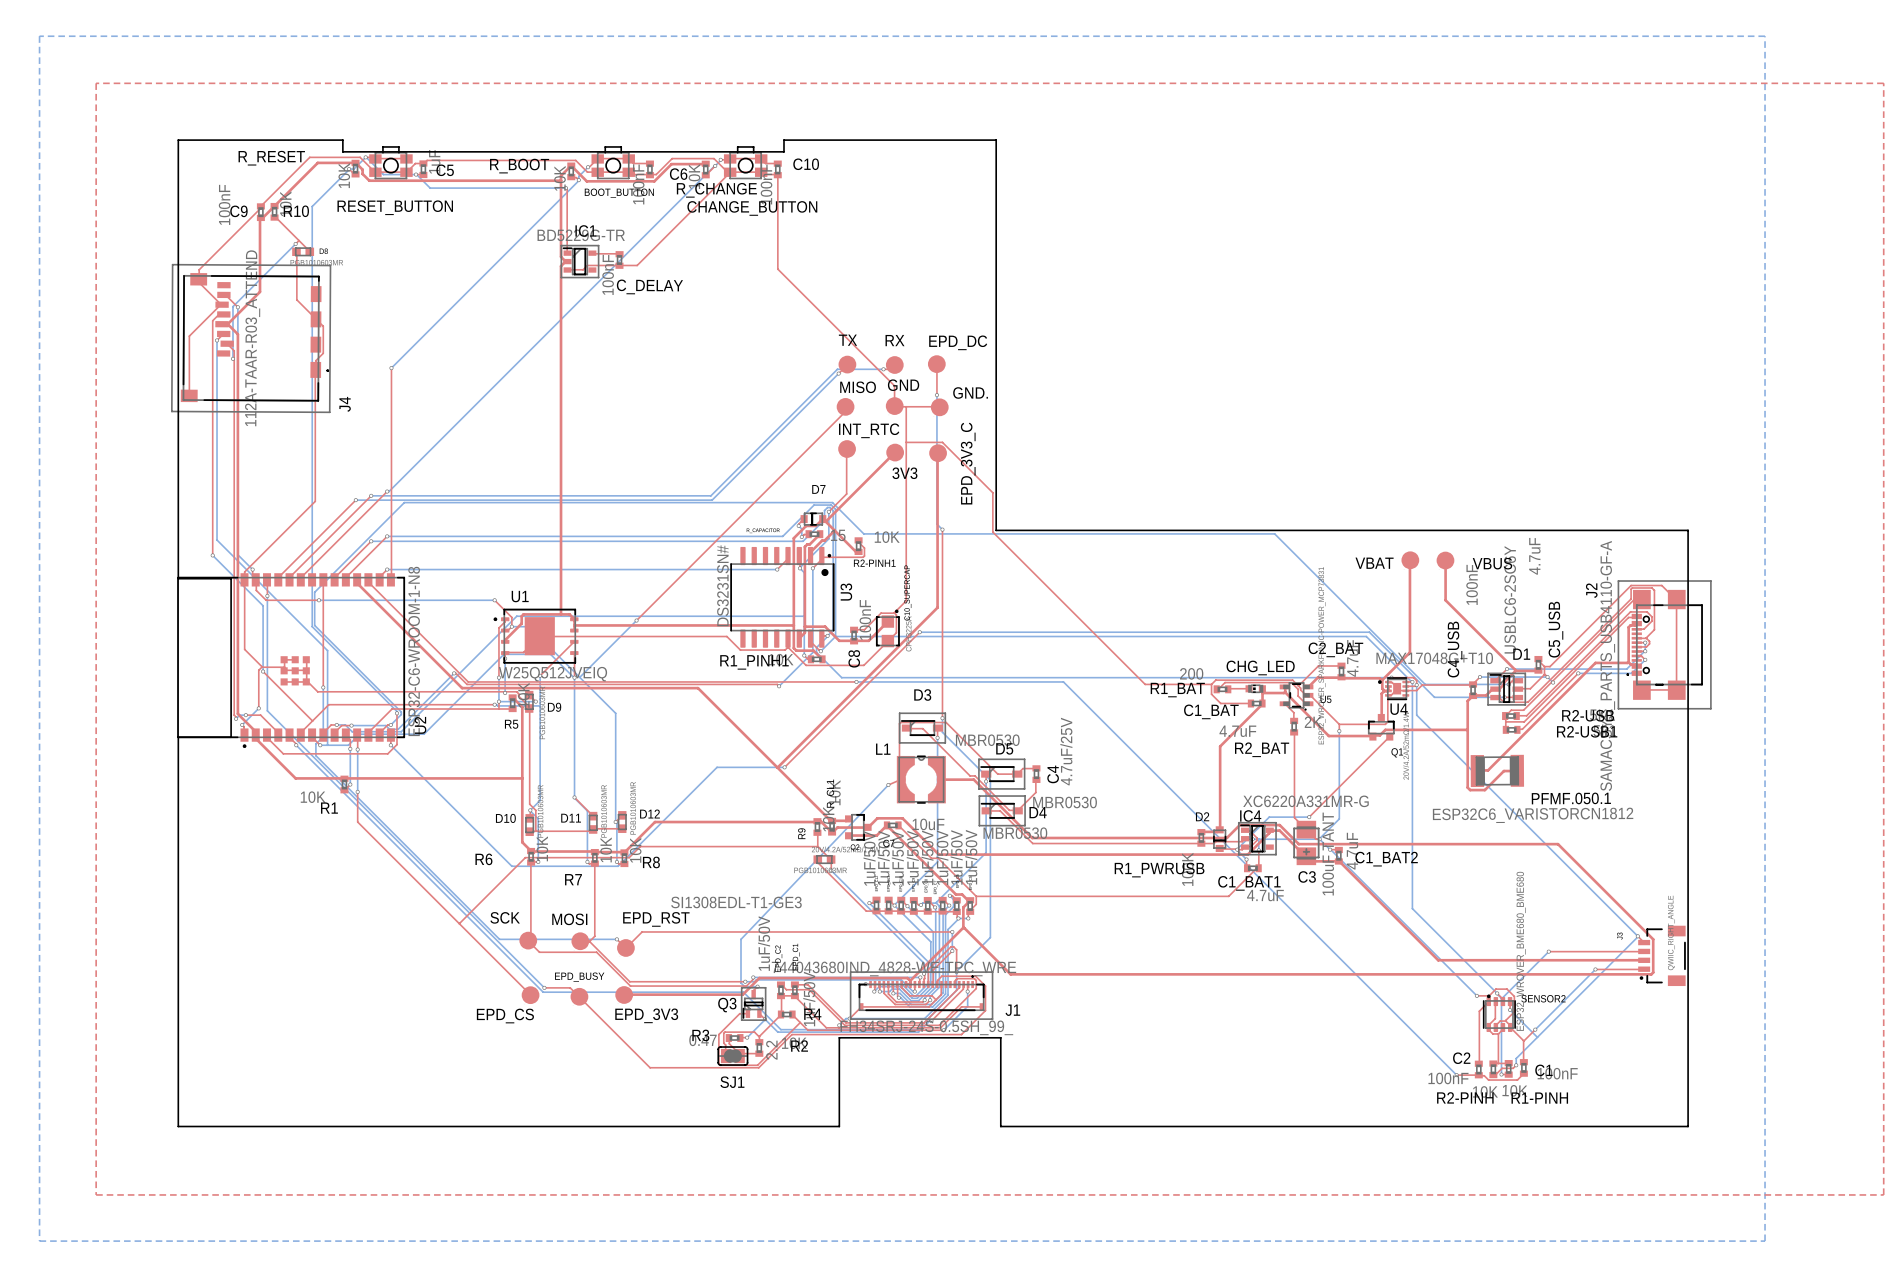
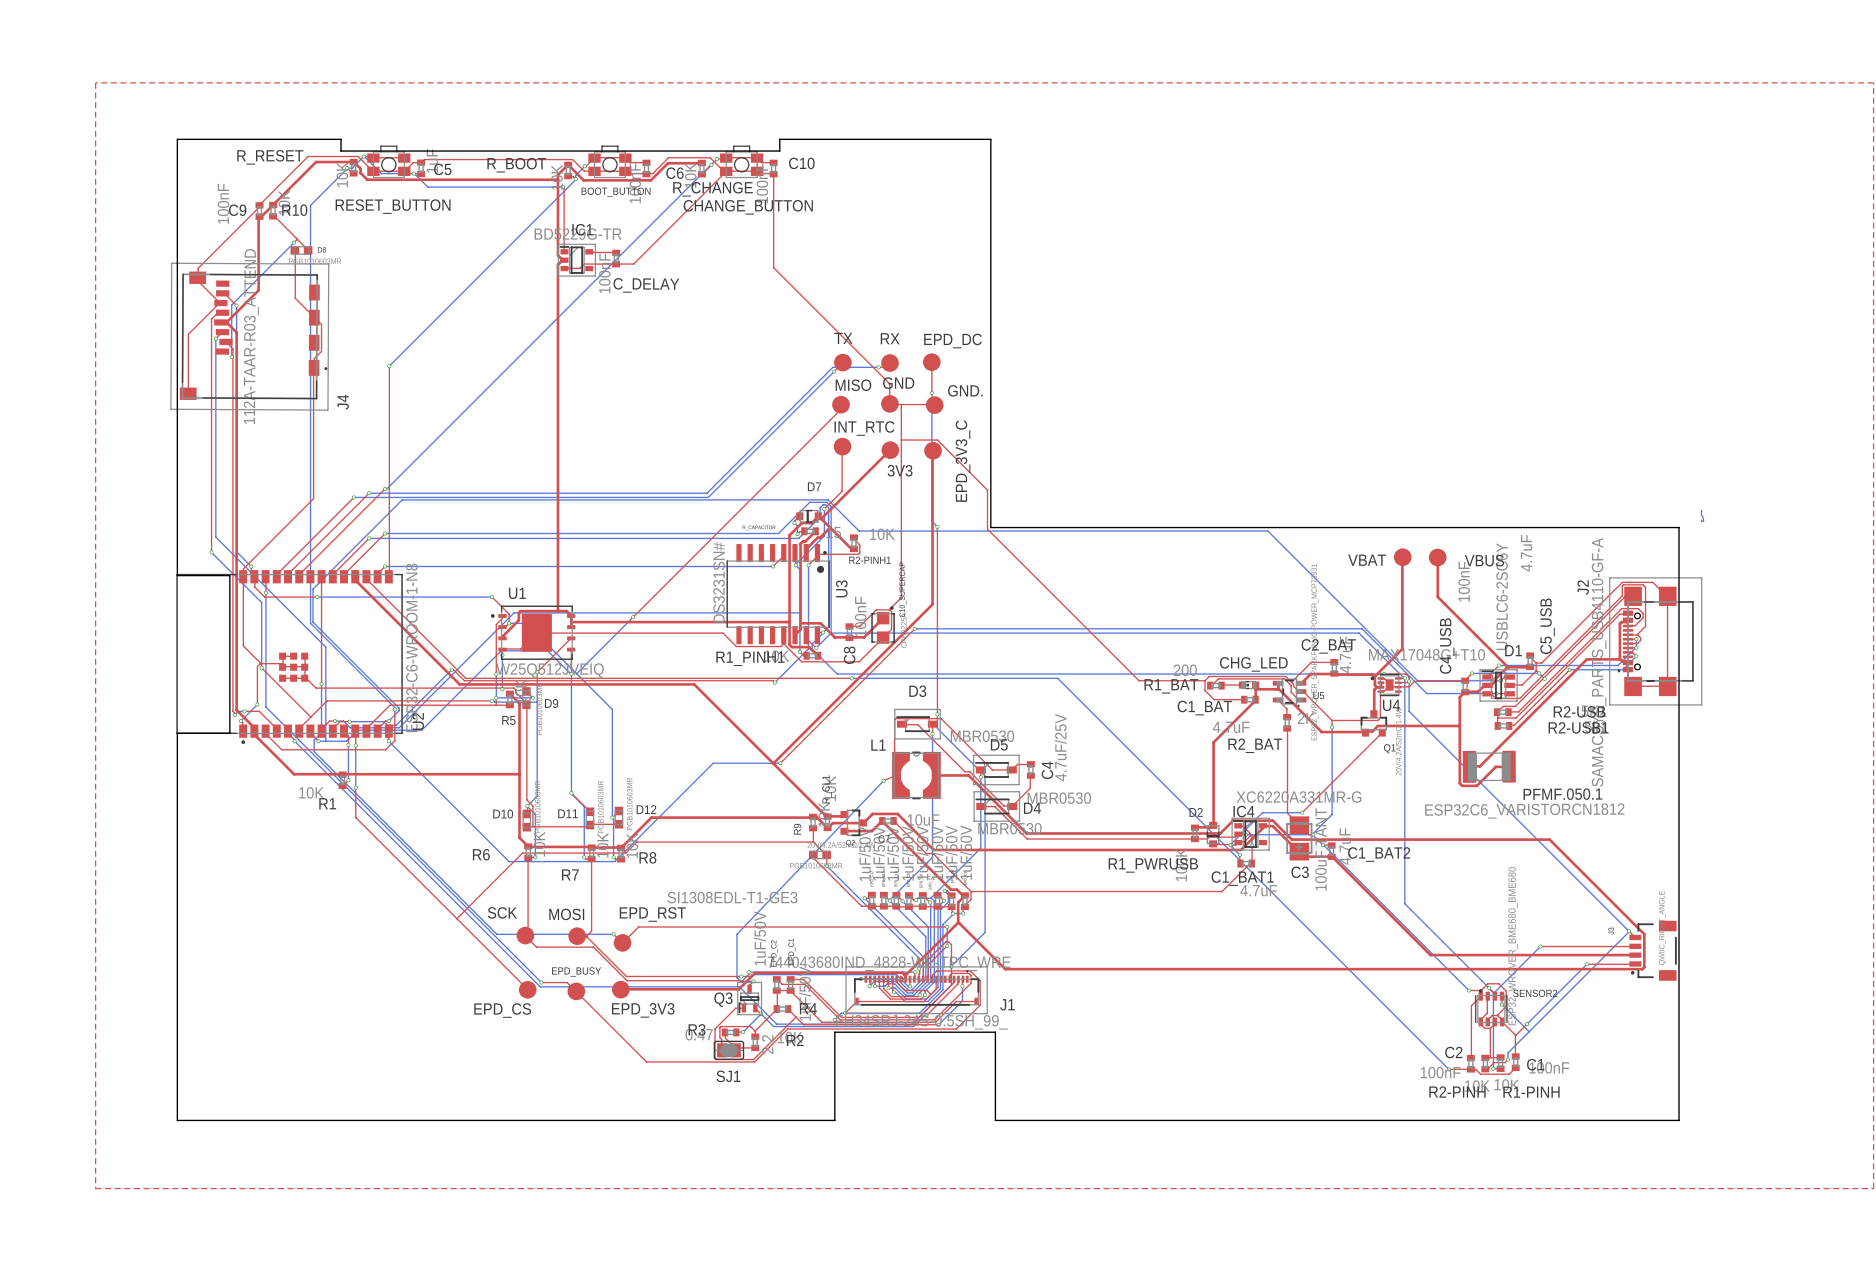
bottom zone outline: (39, 36) (1765, 36) (1765, 1241) (39, 1241) (39, 36) -> none
bottom zone outline: none -> (1701, 510) (1703, 521) (1701, 521) (1701, 510)

